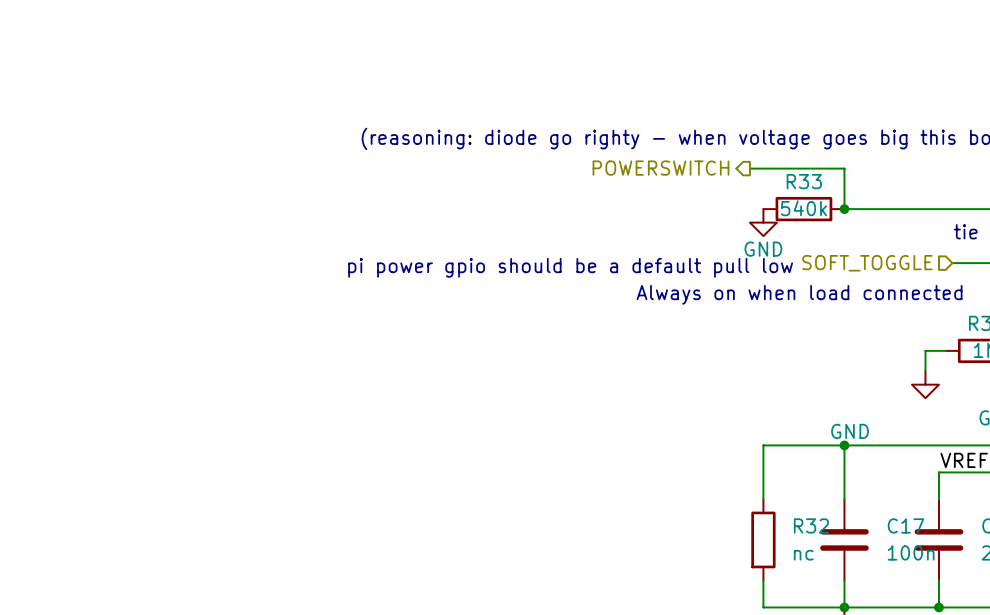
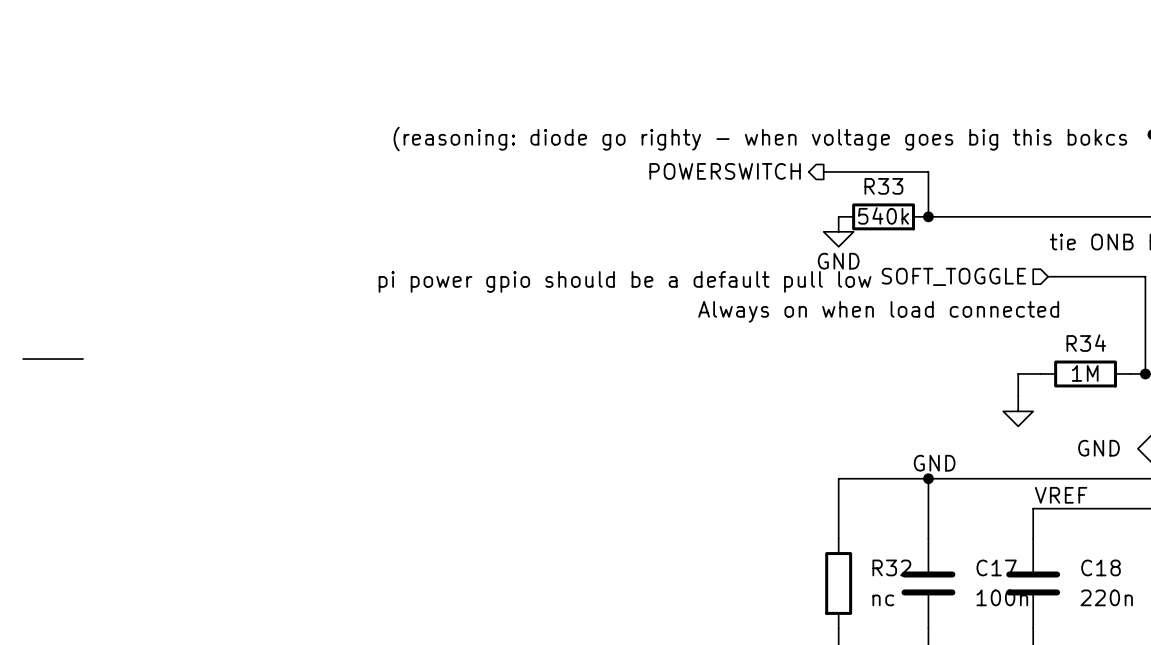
wire: none -> (23, 359) (83, 359)

